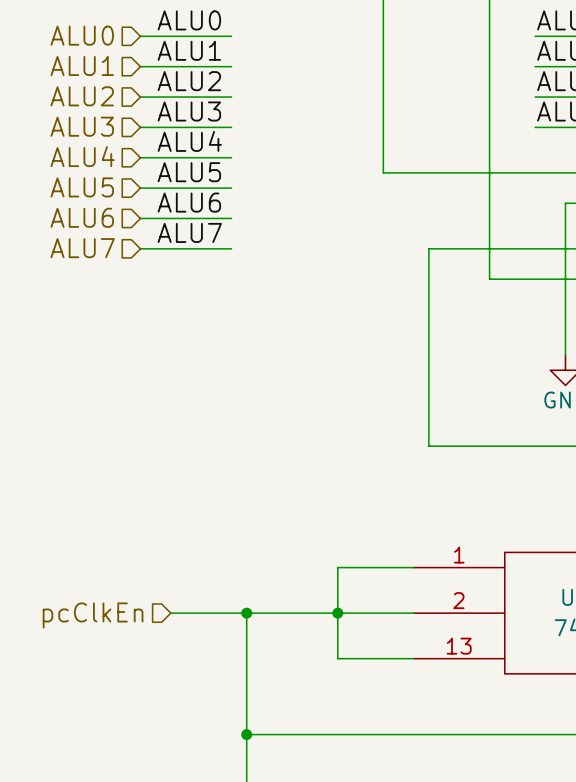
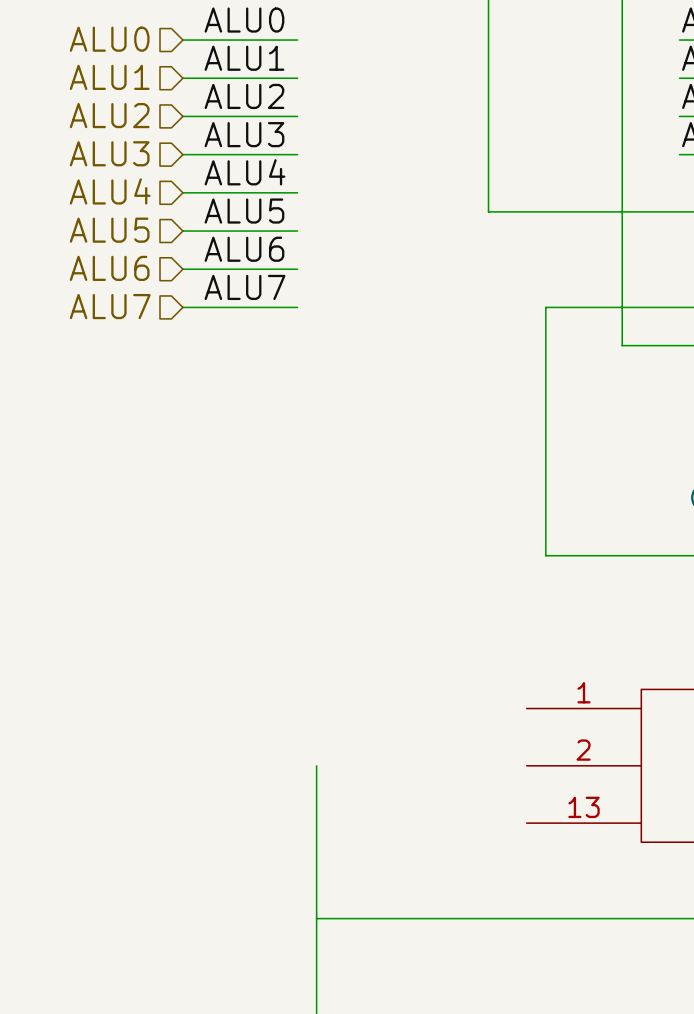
wire: (413, 567) (337, 567) (337, 658) (413, 658) -> none
wire: (170, 613) (413, 613) -> none
junction: (246, 613) -> none
junction: (337, 613) -> none
hierarchical label: pcClkEn (93, 615) -> none
junction: (246, 734) -> none

